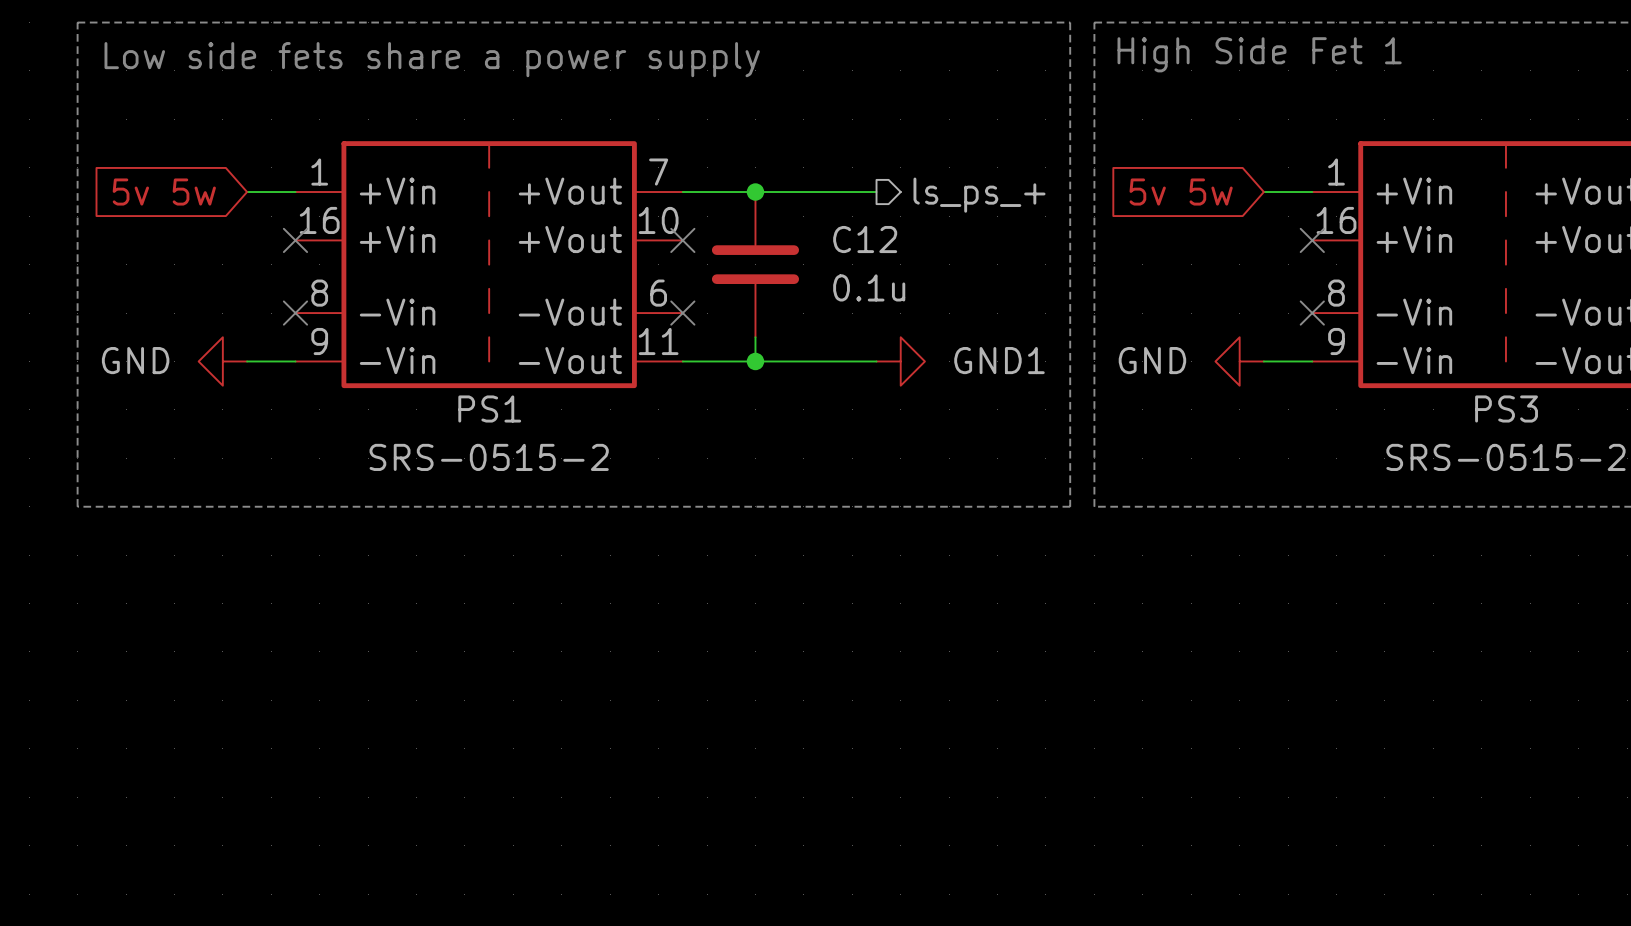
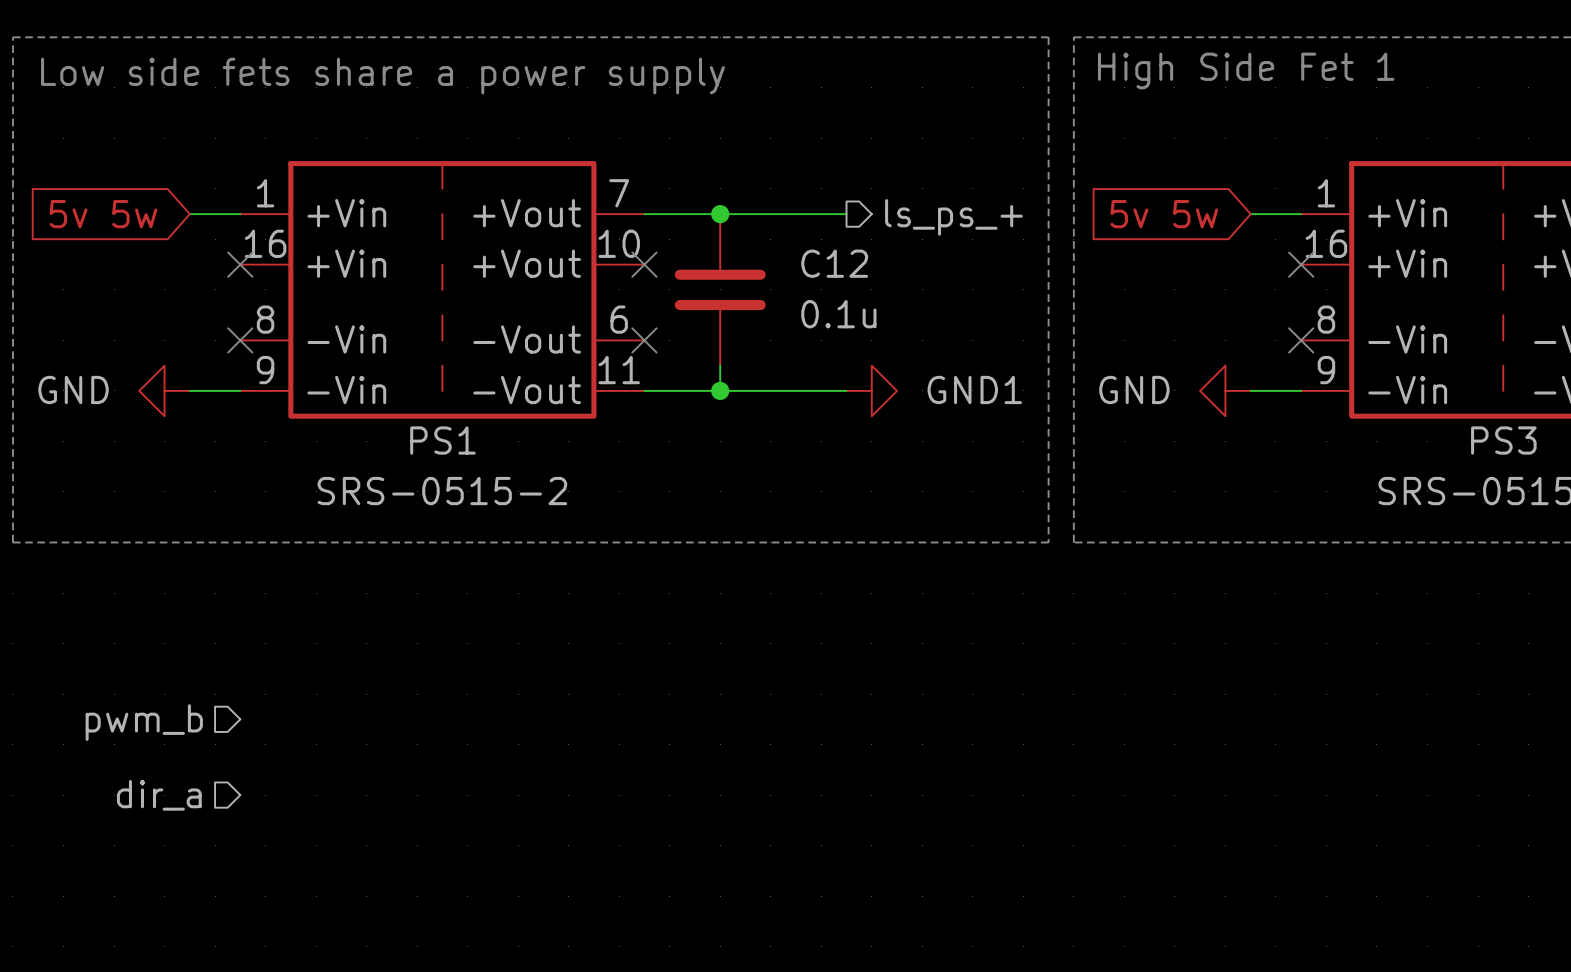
hierarchical label: none -> pwm_b (144, 722)
hierarchical label: none -> dir_a (159, 795)

